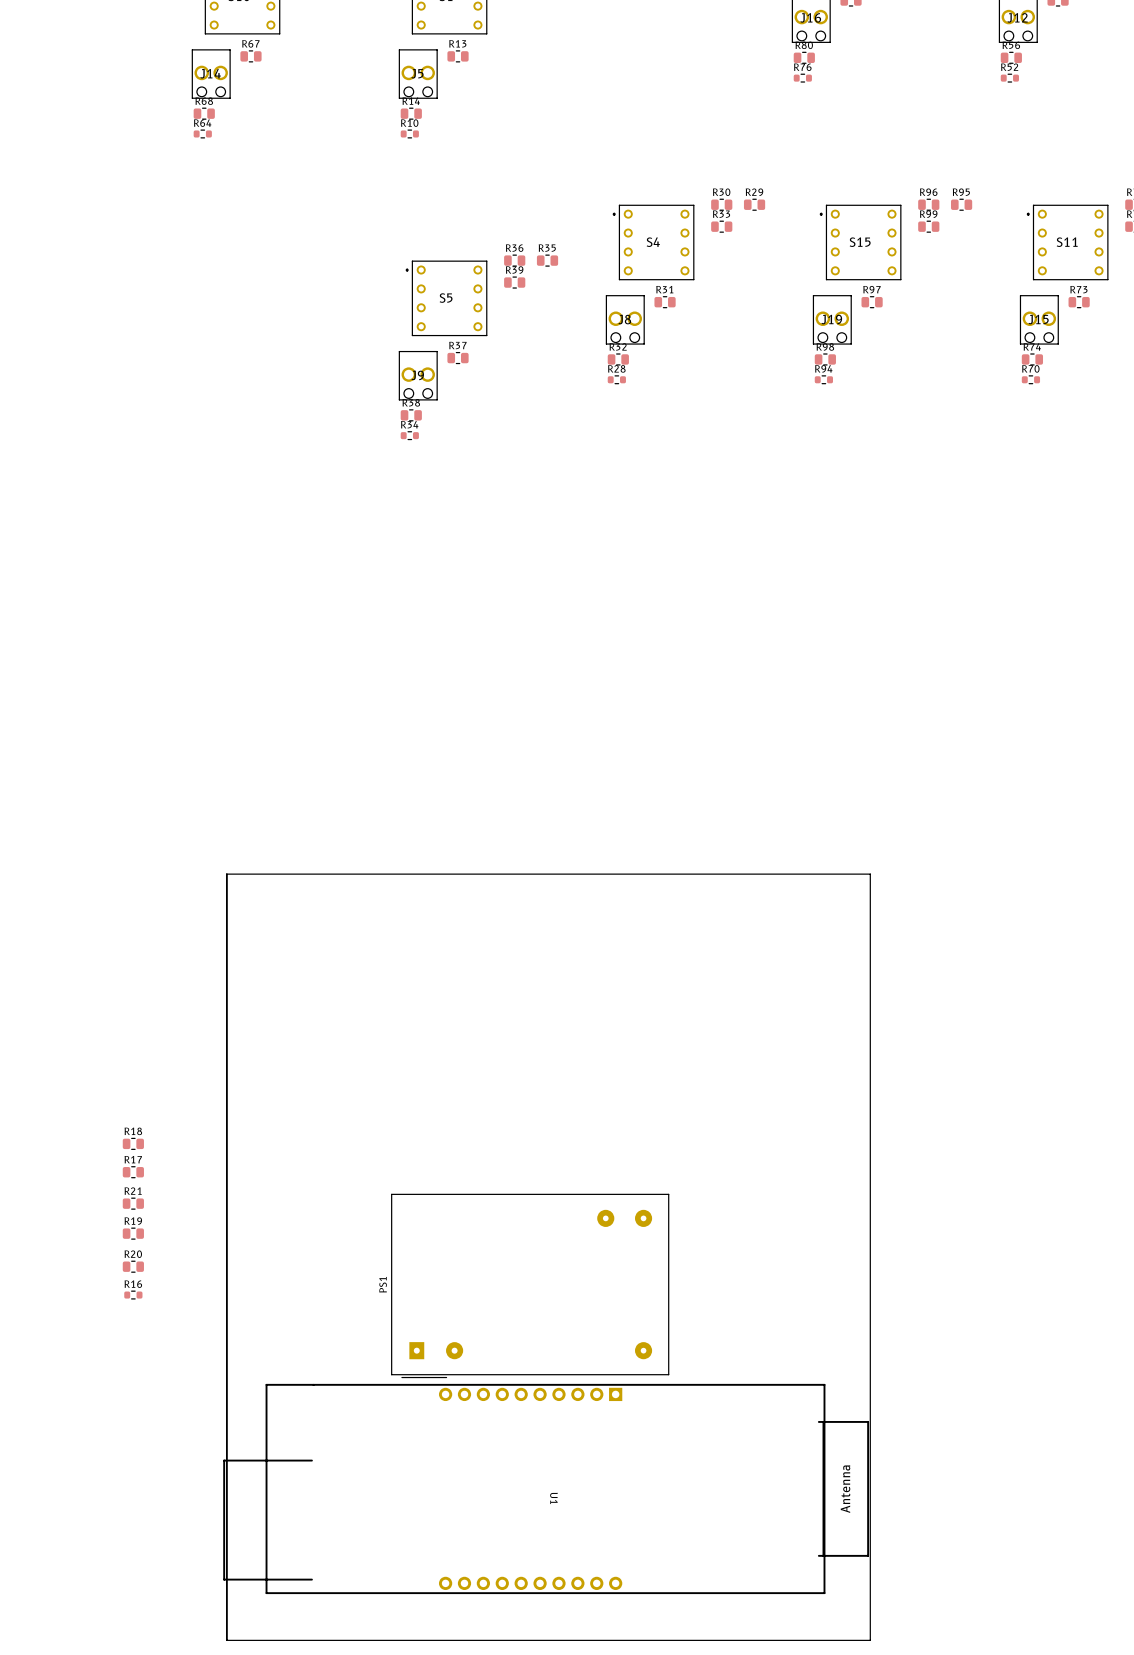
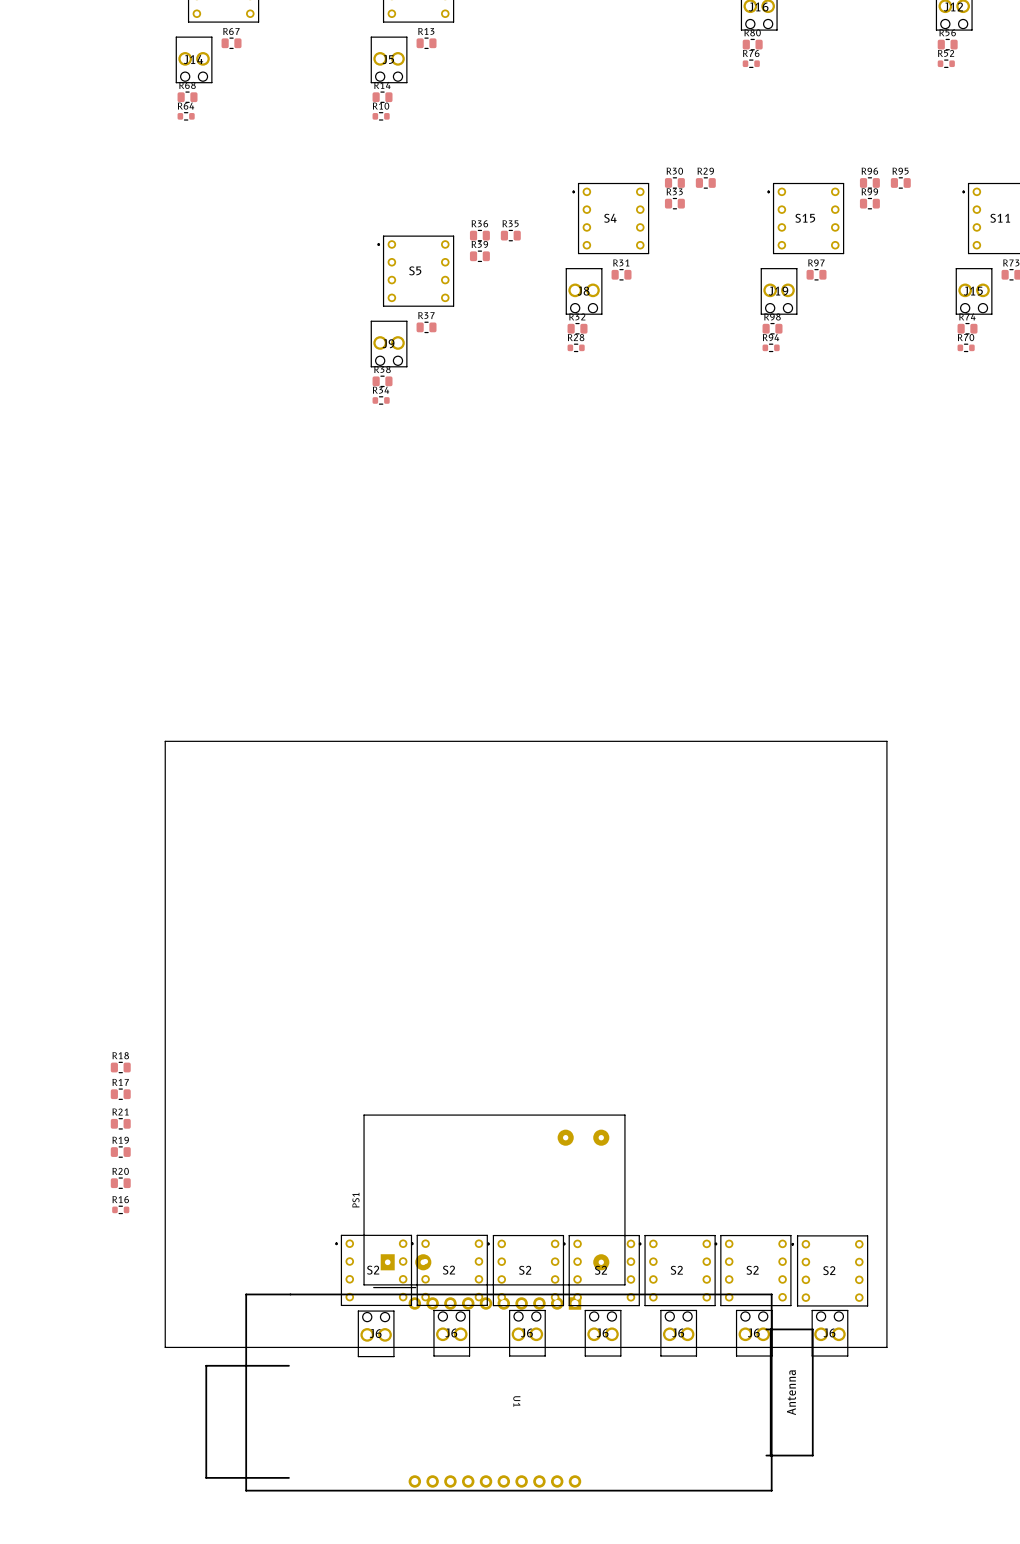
board edge: (226, 874) (870, 874) (870, 1640) (226, 1640) (226, 874) -> (165, 741) (165, 1347) (886, 1347) (886, 741) (165, 741)
S2: none -> (373, 1270)
S2: none -> (449, 1270)
S2: none -> (525, 1270)
S2: none -> (601, 1270)
S2: none -> (677, 1270)
S2: none -> (752, 1270)
S2: none -> (829, 1270)
J6: none -> (376, 1333)
J6: none -> (451, 1333)
J6: none -> (527, 1333)
J6: none -> (603, 1333)
J6: none -> (678, 1333)
J6: none -> (754, 1333)
J6: none -> (829, 1333)

